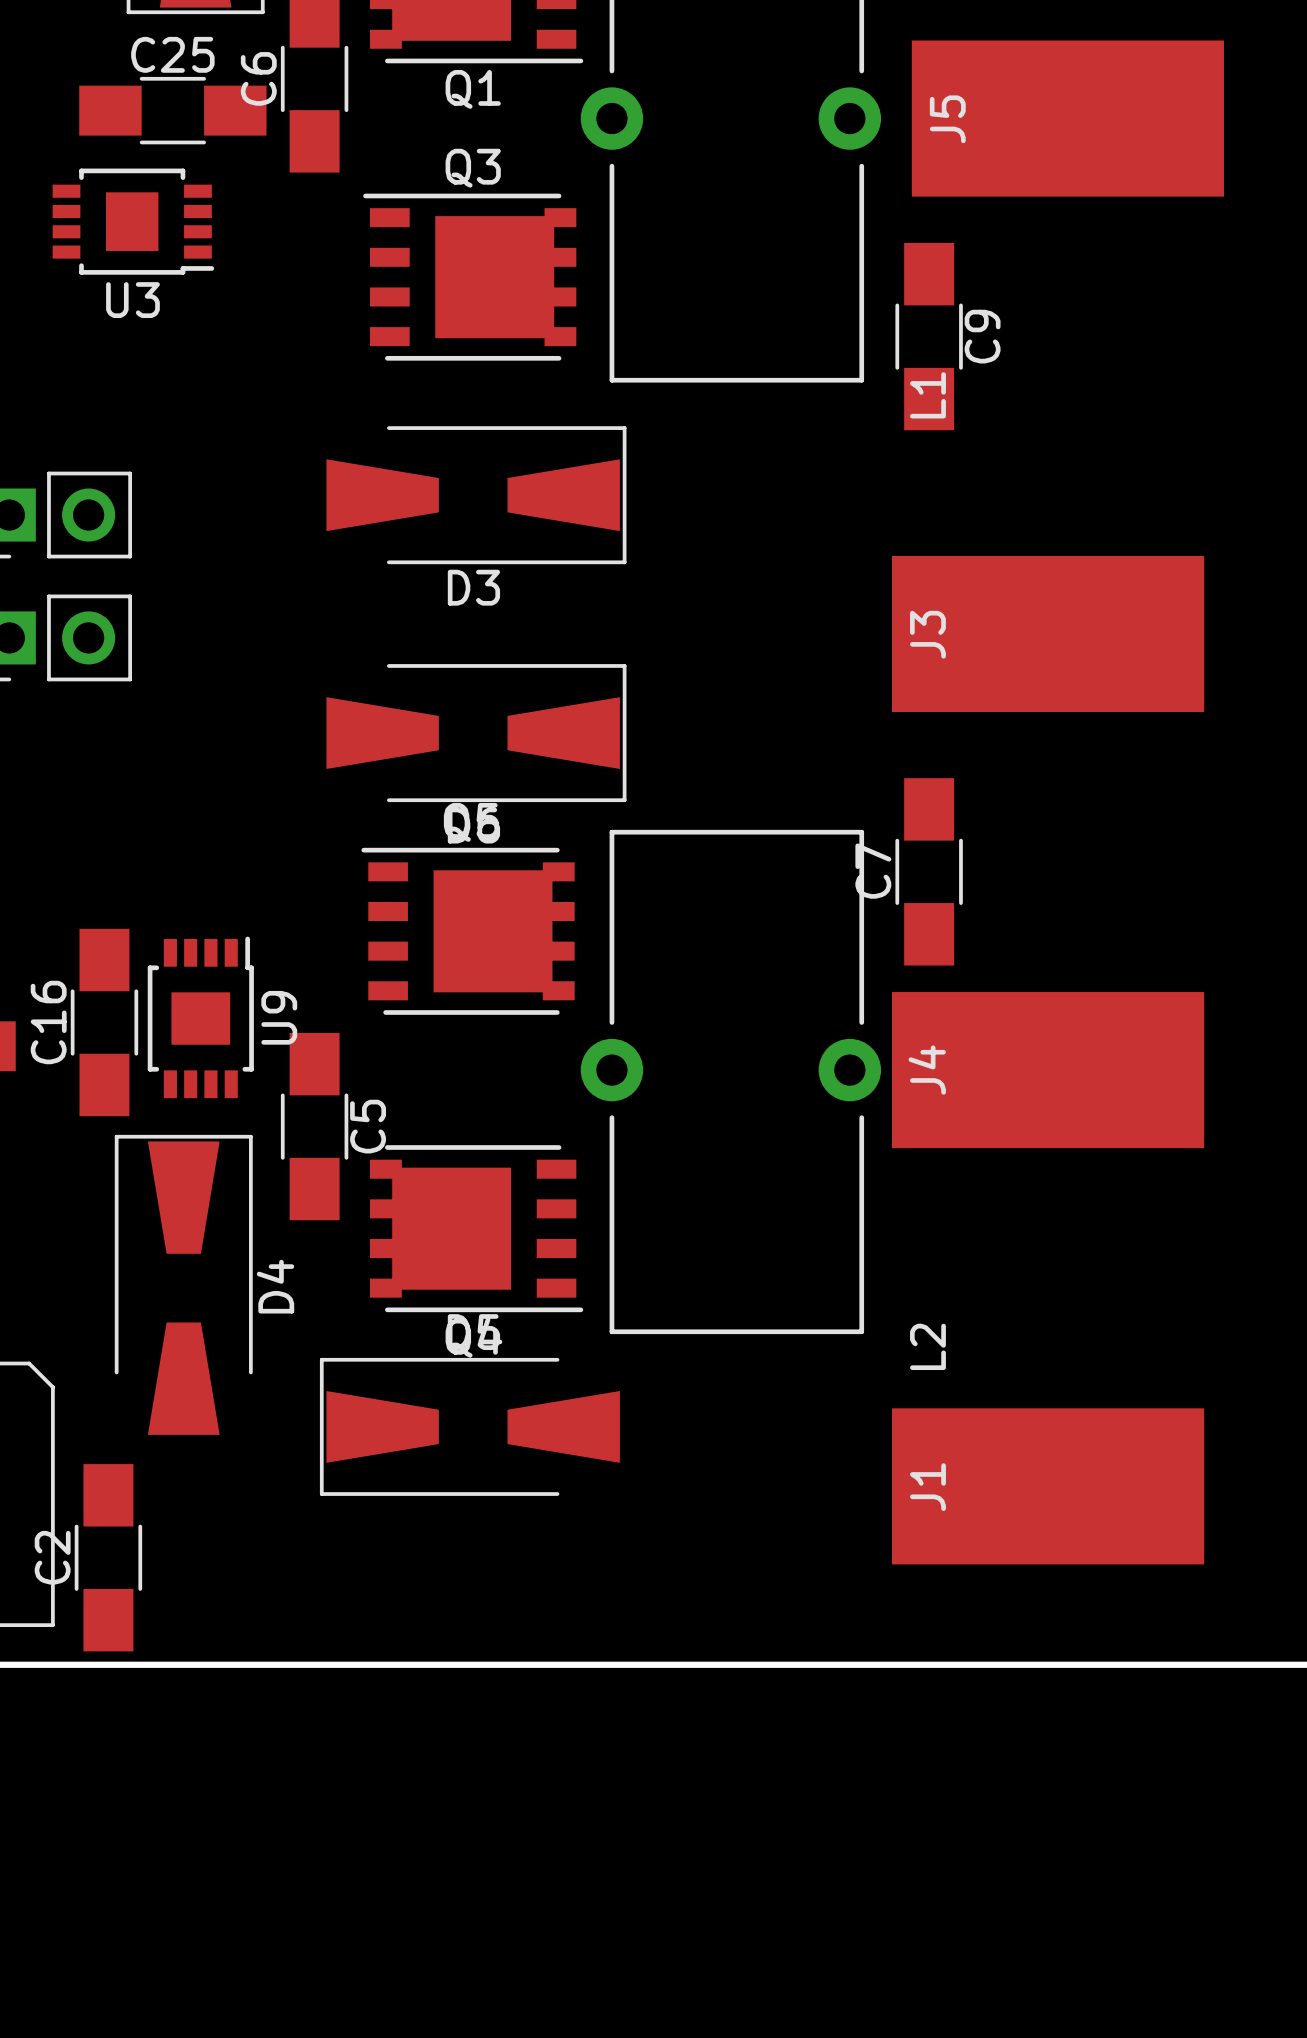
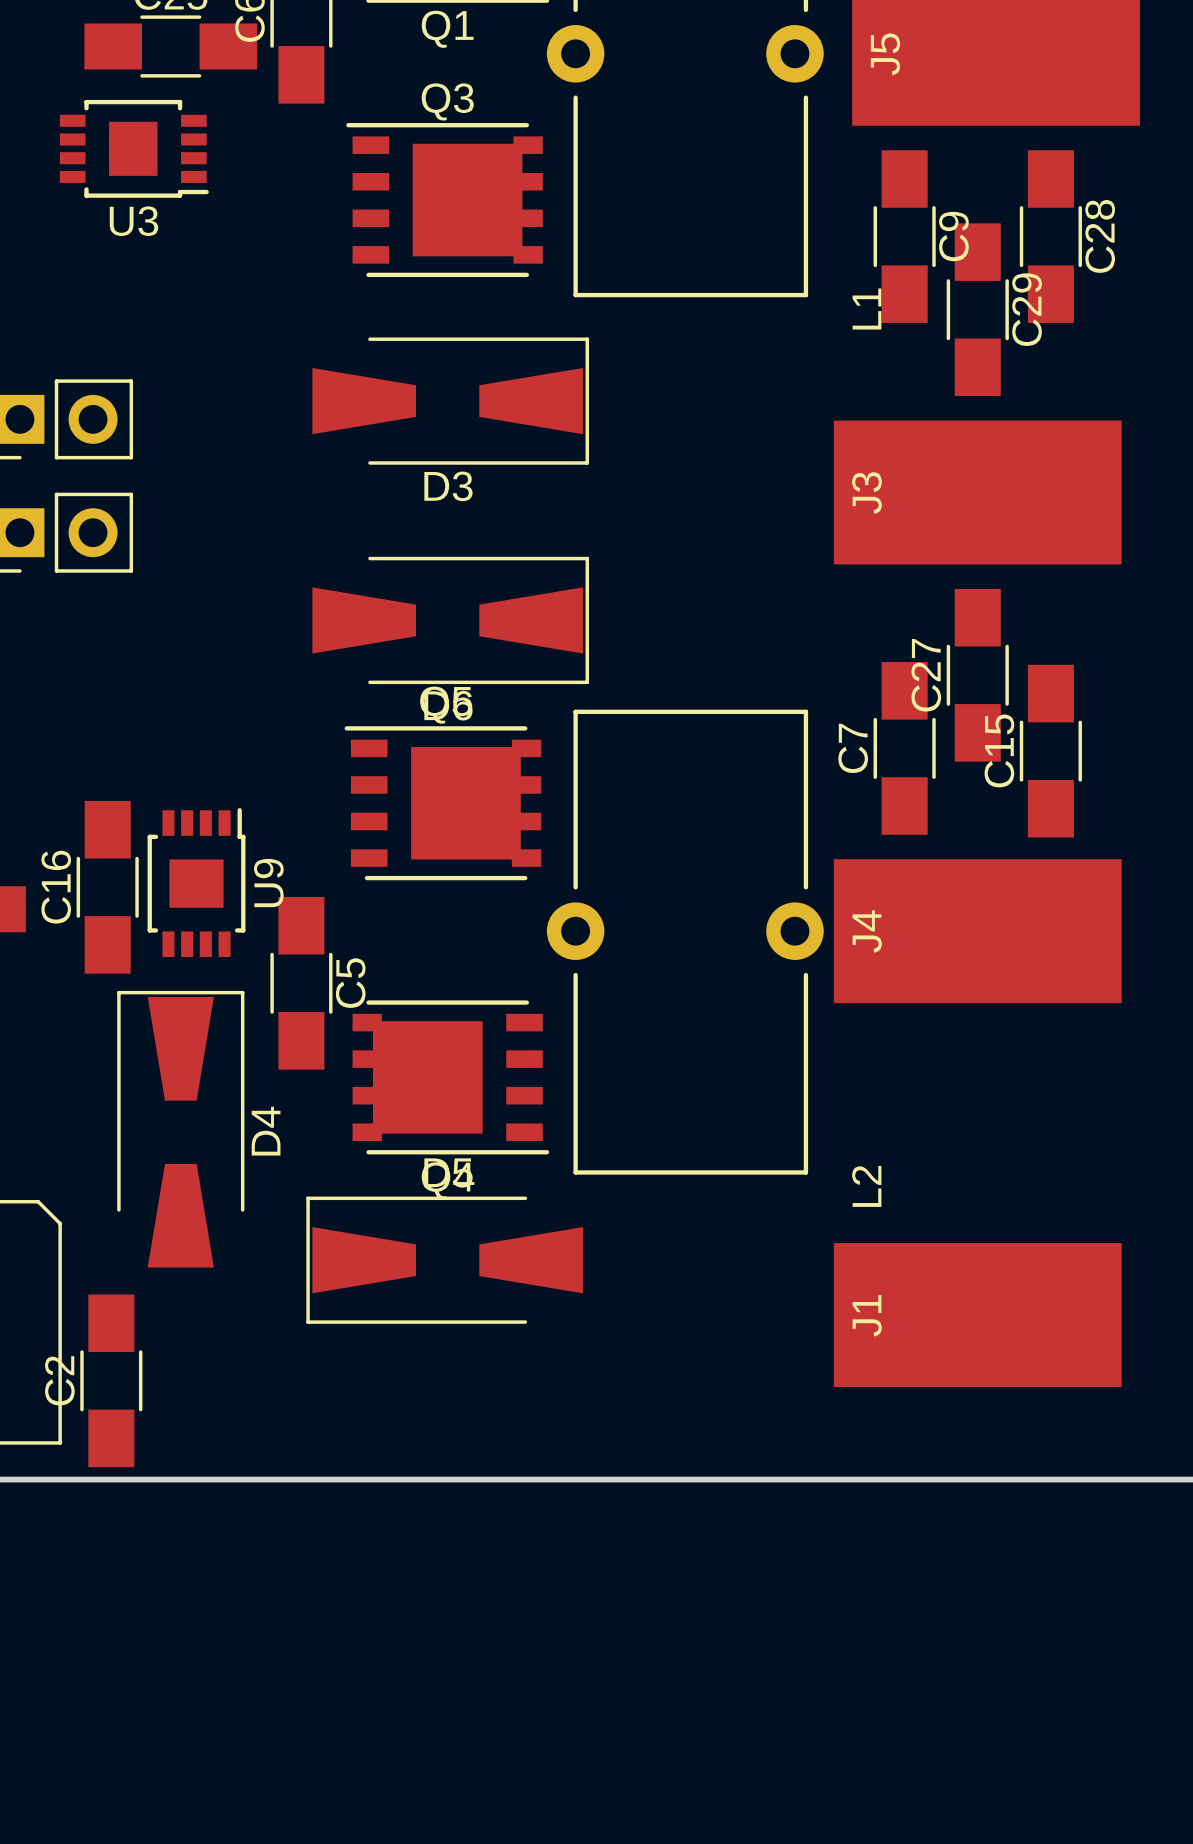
C28: none -> (1050, 236)
C9 position: (929, 336) -> (904, 236)
C29: none -> (977, 309)
J3 position: (1048, 633) -> (977, 492)
C27: none -> (977, 675)
C7 position: (929, 871) -> (904, 748)
C15: none -> (1050, 751)

